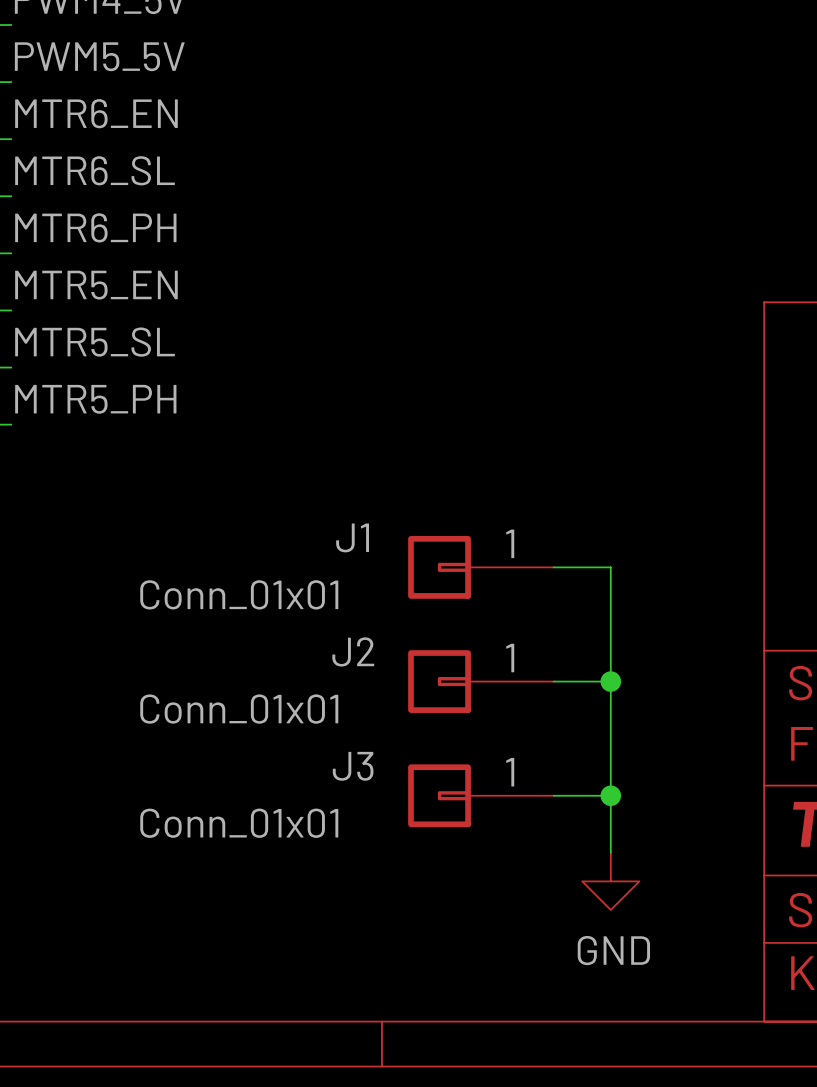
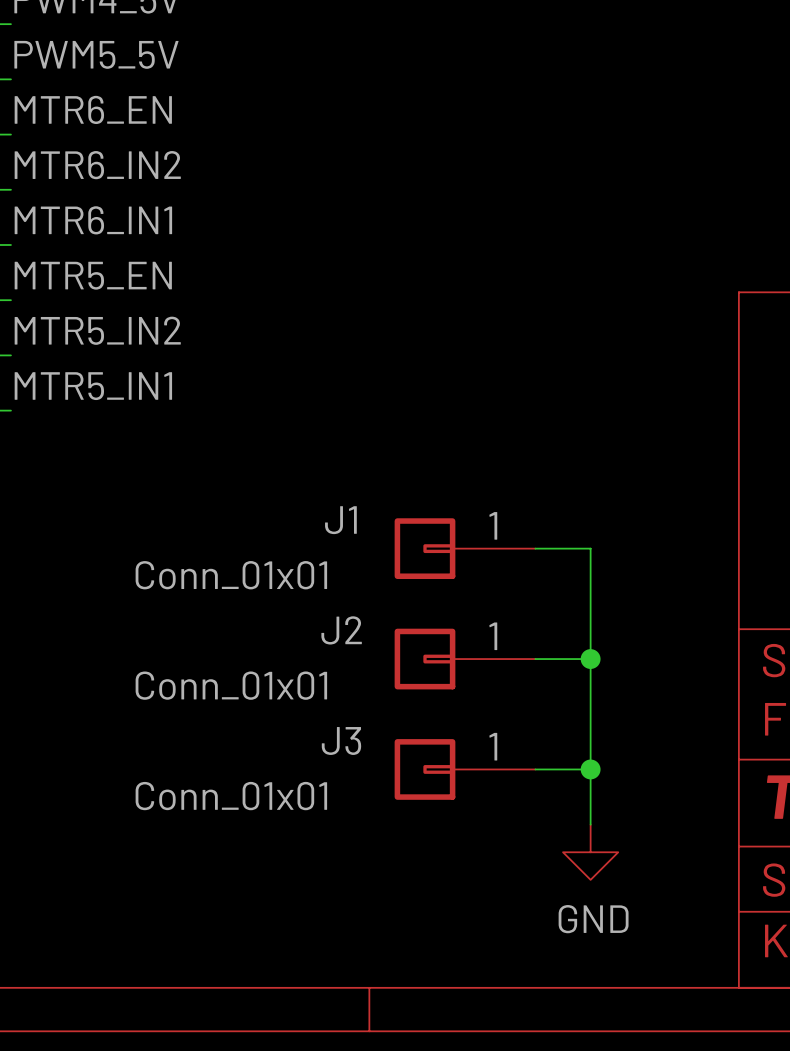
label: MTR6_SL (95, 170) -> MTR6_IN2 (97, 165)
label: MTR6_PH (95, 227) -> MTR6_IN1 (93, 220)
label: MTR5_SL (95, 342) -> MTR5_IN2 (97, 330)
label: MTR5_PH (95, 399) -> MTR5_IN1 (93, 386)

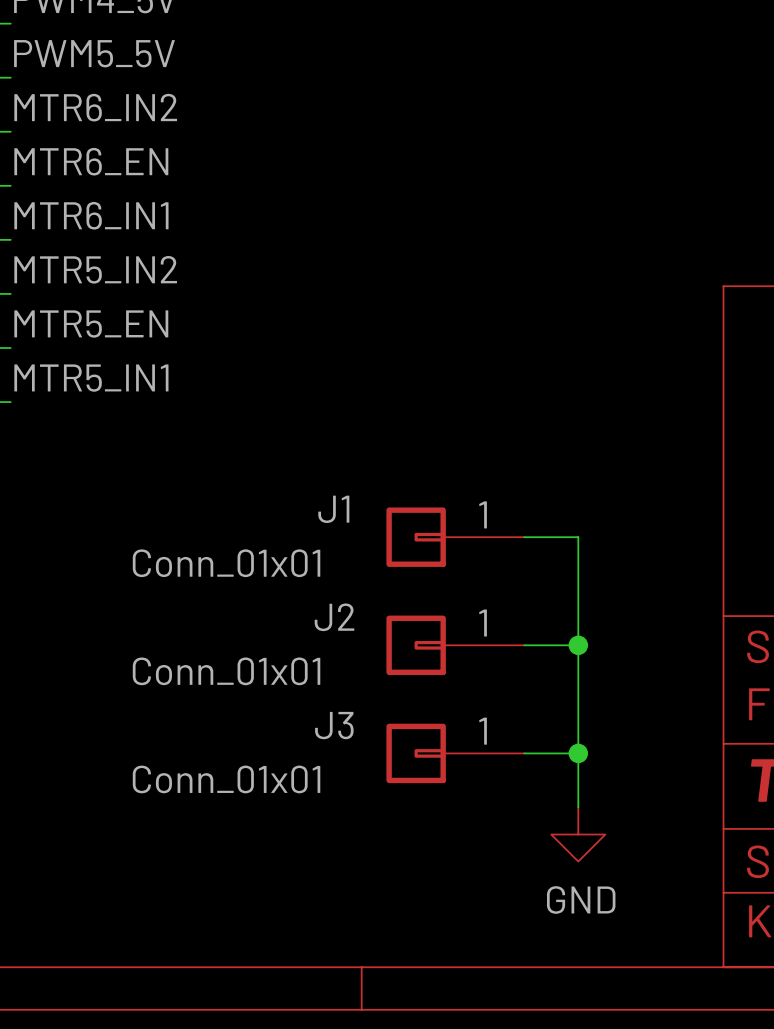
label: MTR6_EN (93, 109) -> MTR6_IN2 (95, 107)
label: MTR6_IN2 (97, 165) -> MTR6_EN (91, 161)
label: MTR5_EN (93, 275) -> MTR5_IN2 (95, 269)
label: MTR5_IN2 (97, 330) -> MTR5_EN (91, 324)

